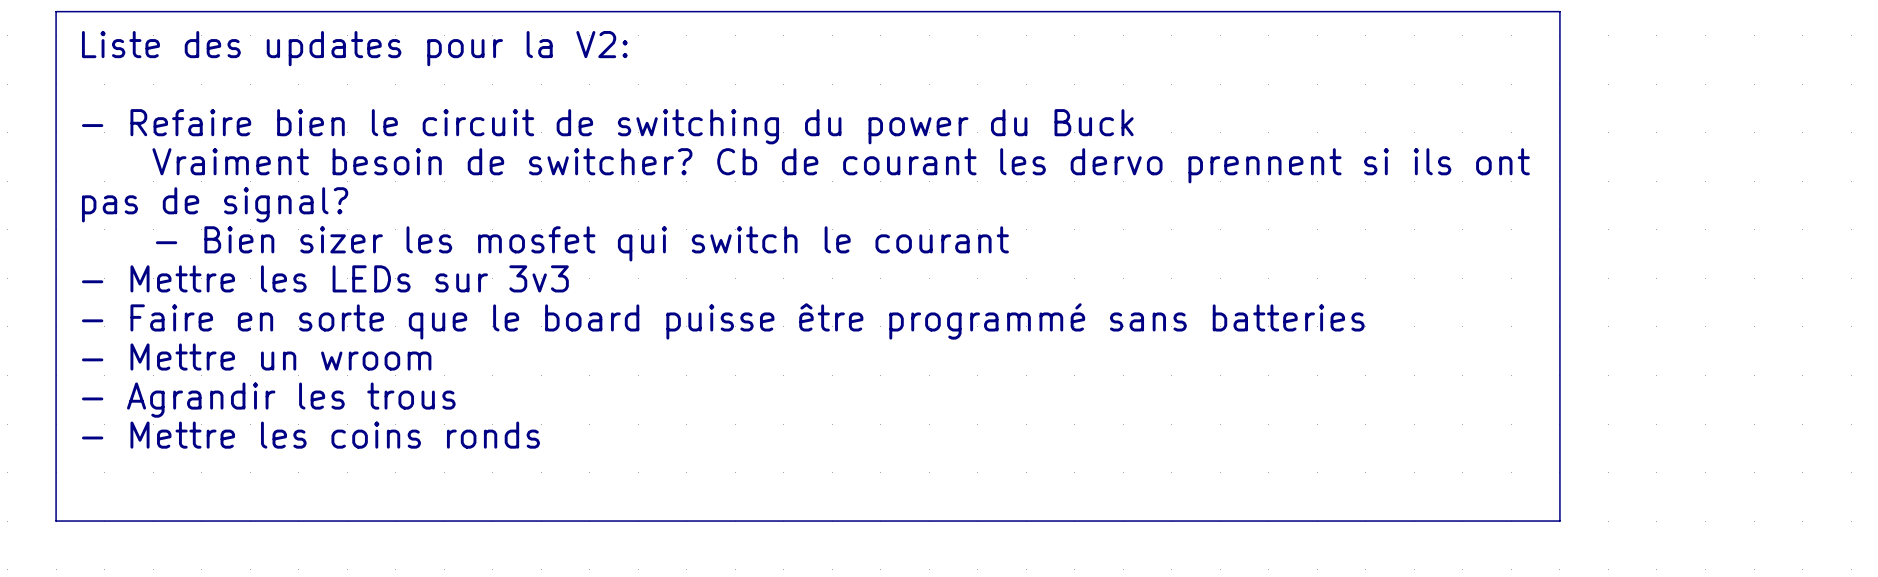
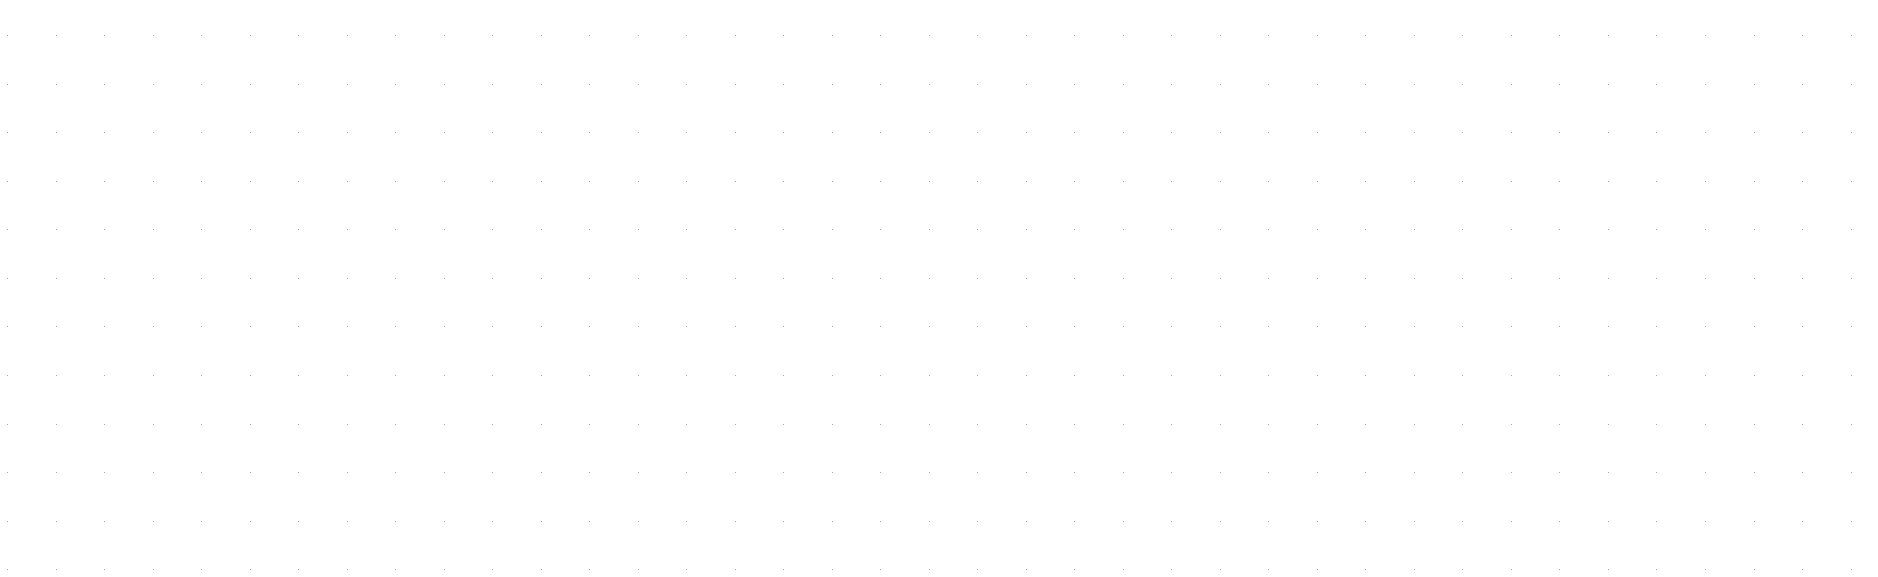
line: (56, 11) (1559, 11) (1559, 521) (56, 521) (56, 11) -> none
text: Liste des updates pour la V2: (354, 48) -> none
text: - Refaire bien le circuit de switching du power du Buck (607, 126) -> none
text: Vraiment besoin de switcher? Cb de courant les dervo prennent si ils ont (841, 165) -> none
text: pas de signal? (215, 204) -> none
text: - Bien sizer les mosfet qui switch le courant (582, 243) -> none
text: - Mettre les LEDs sur 3v3 (325, 278) -> none
text: - Faire en sorte que le board puisse être programmé sans batteries (723, 321) -> none
text: - Mettre un wroom (256, 356) -> none
text: - Agrandir les trous (268, 400) -> none
text: - Mettre les coins ronds (310, 435) -> none

